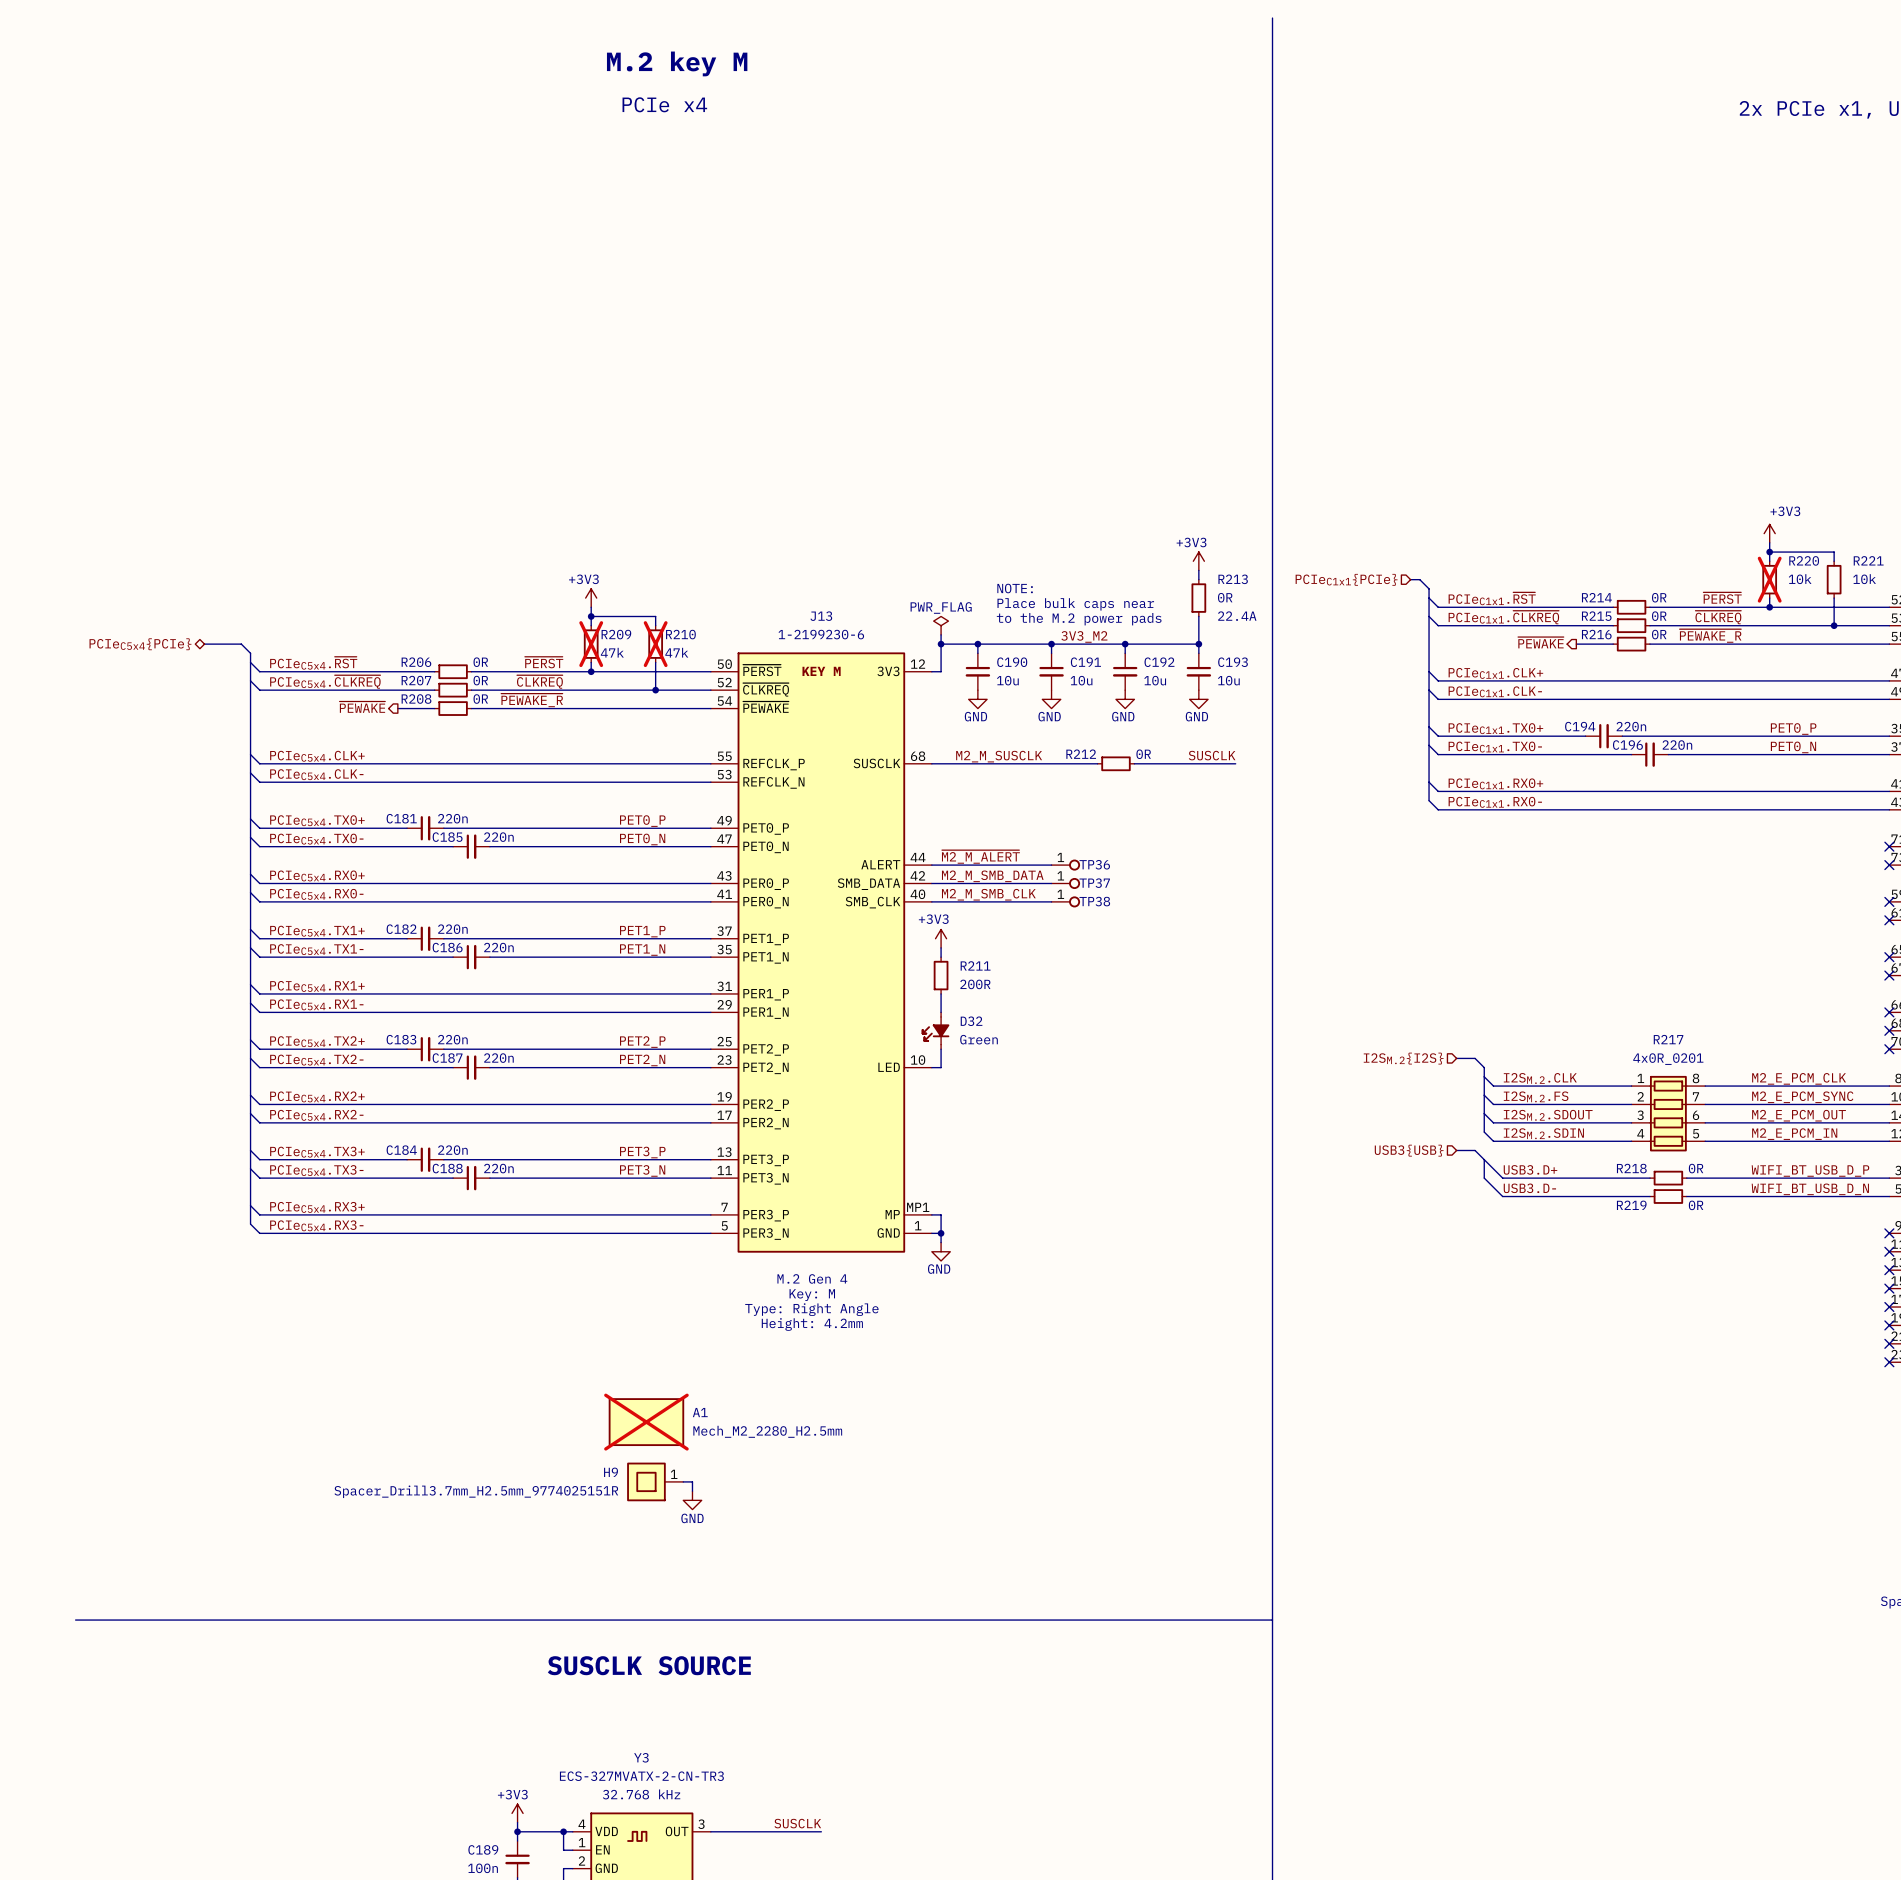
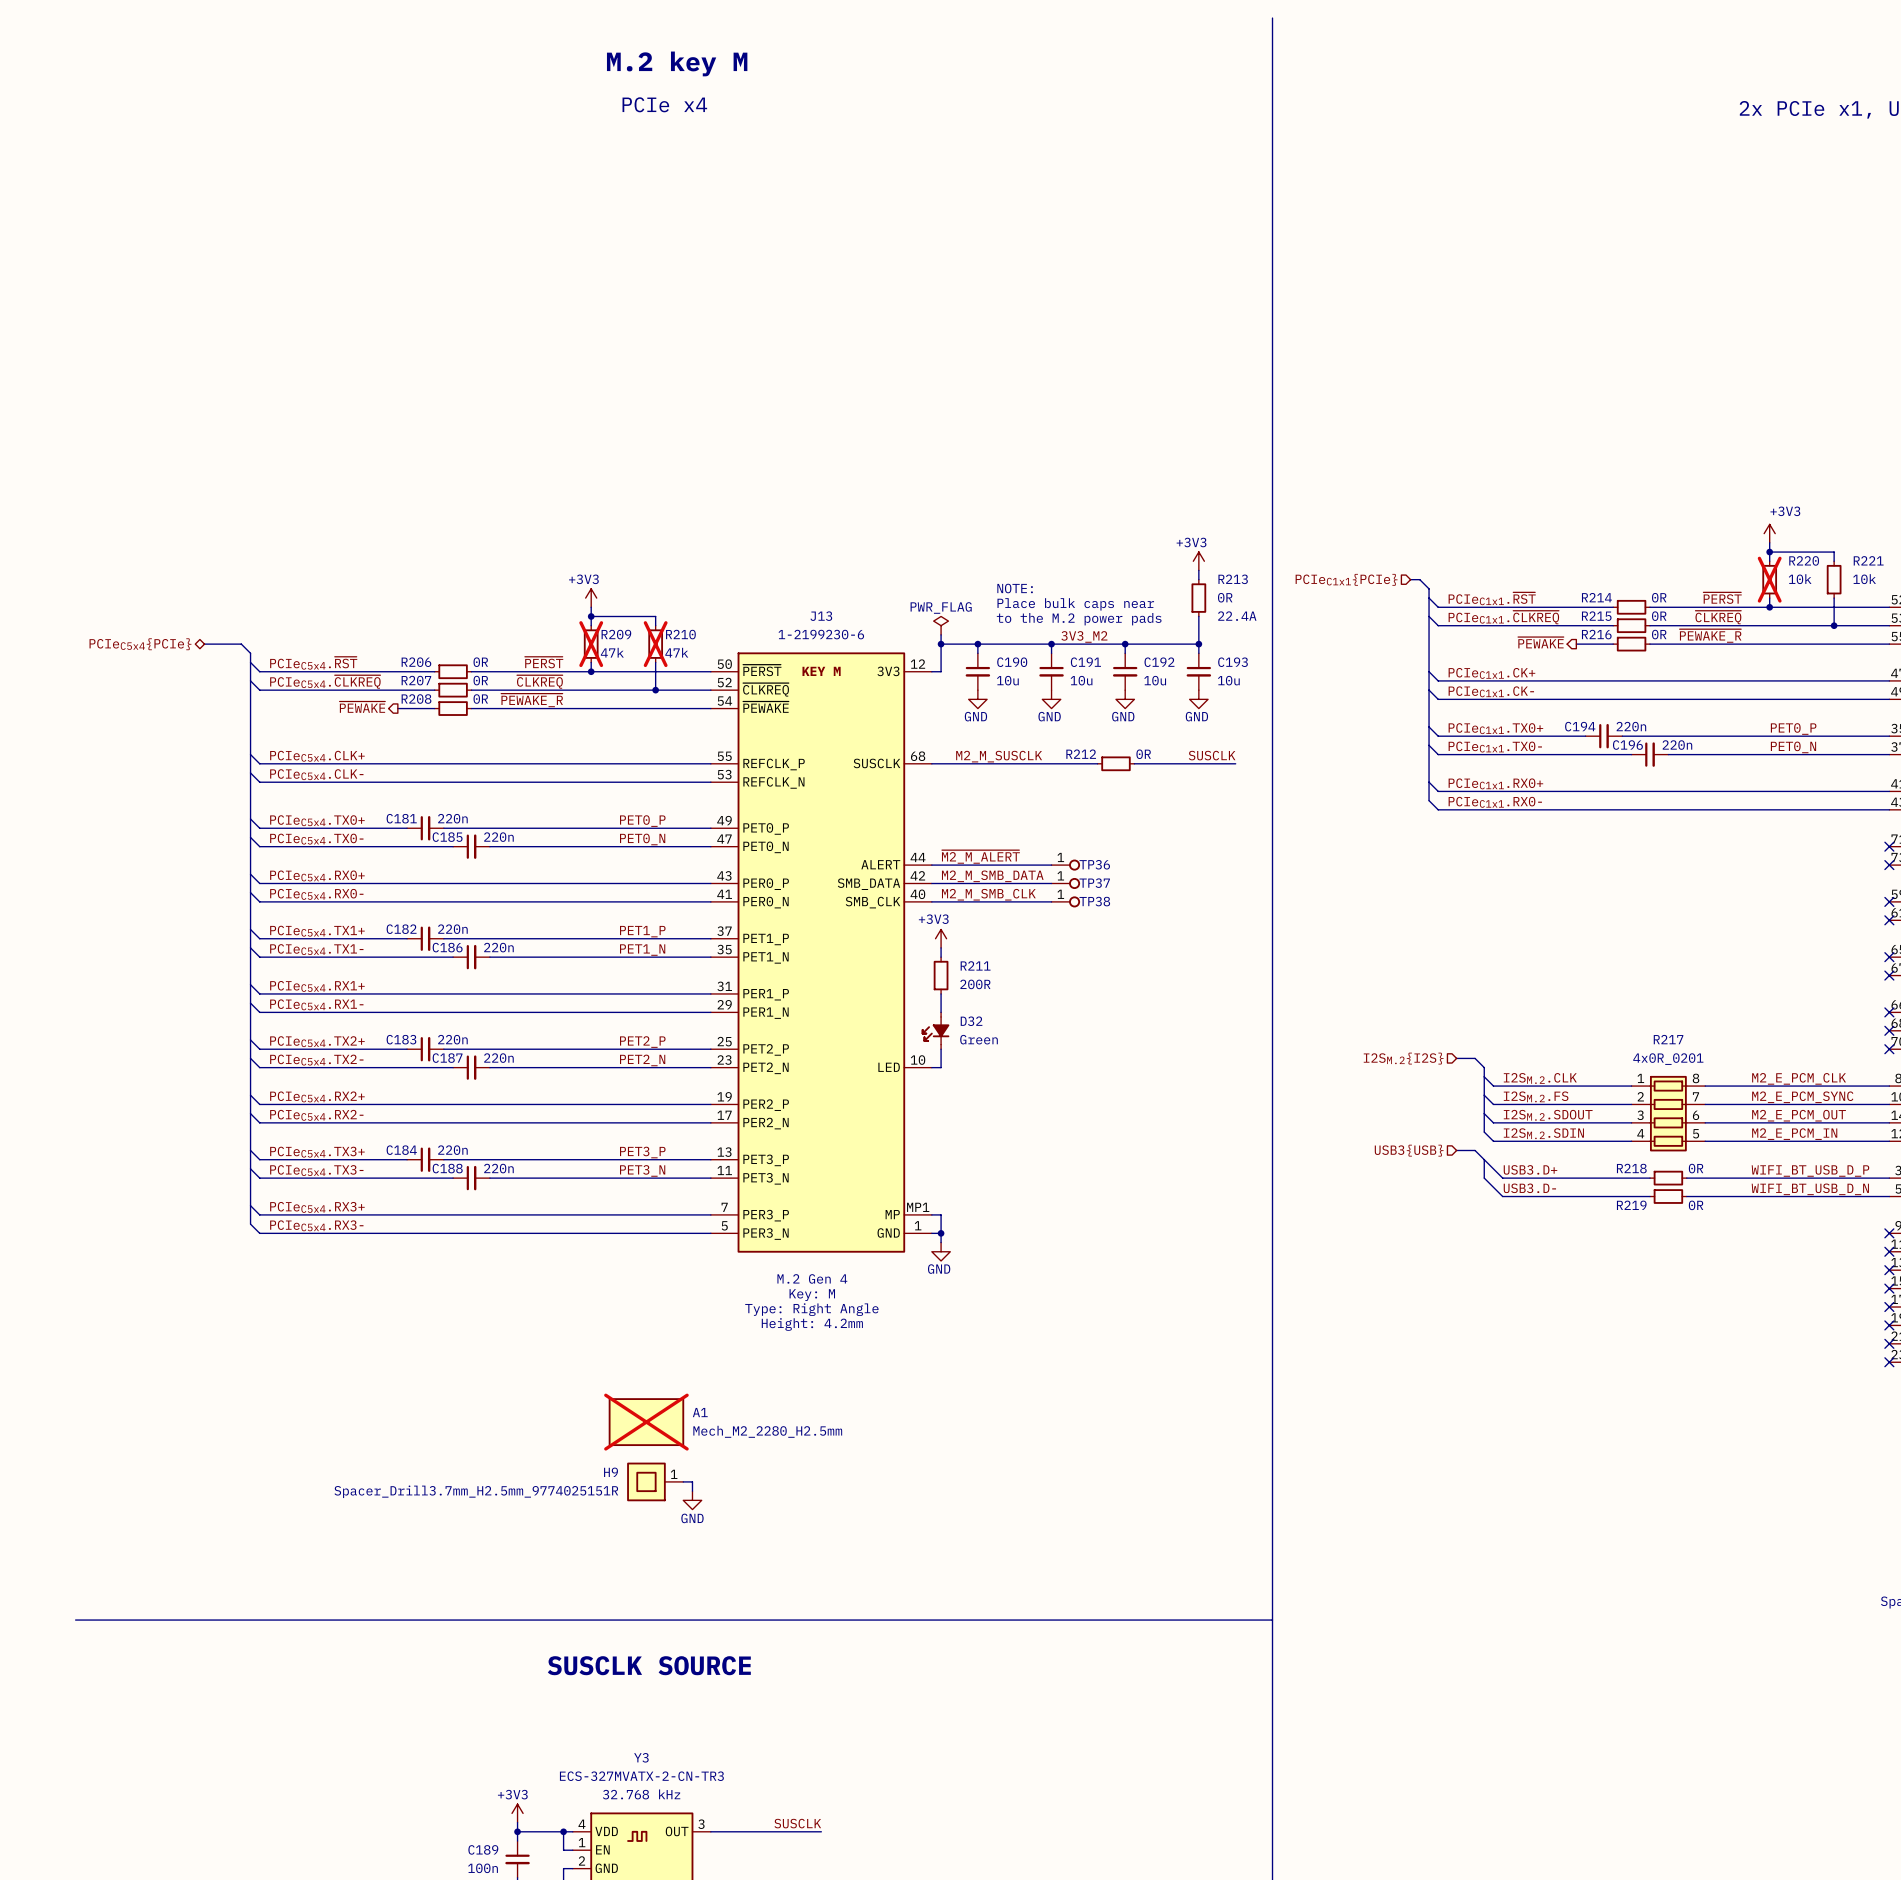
label: PCIeC1x1.CLK+ (1495, 673) -> PCIeC1x1.CK+ (1491, 673)
label: PCIeC1x1.CLK- (1495, 691) -> PCIeC1x1.CK- (1491, 691)

